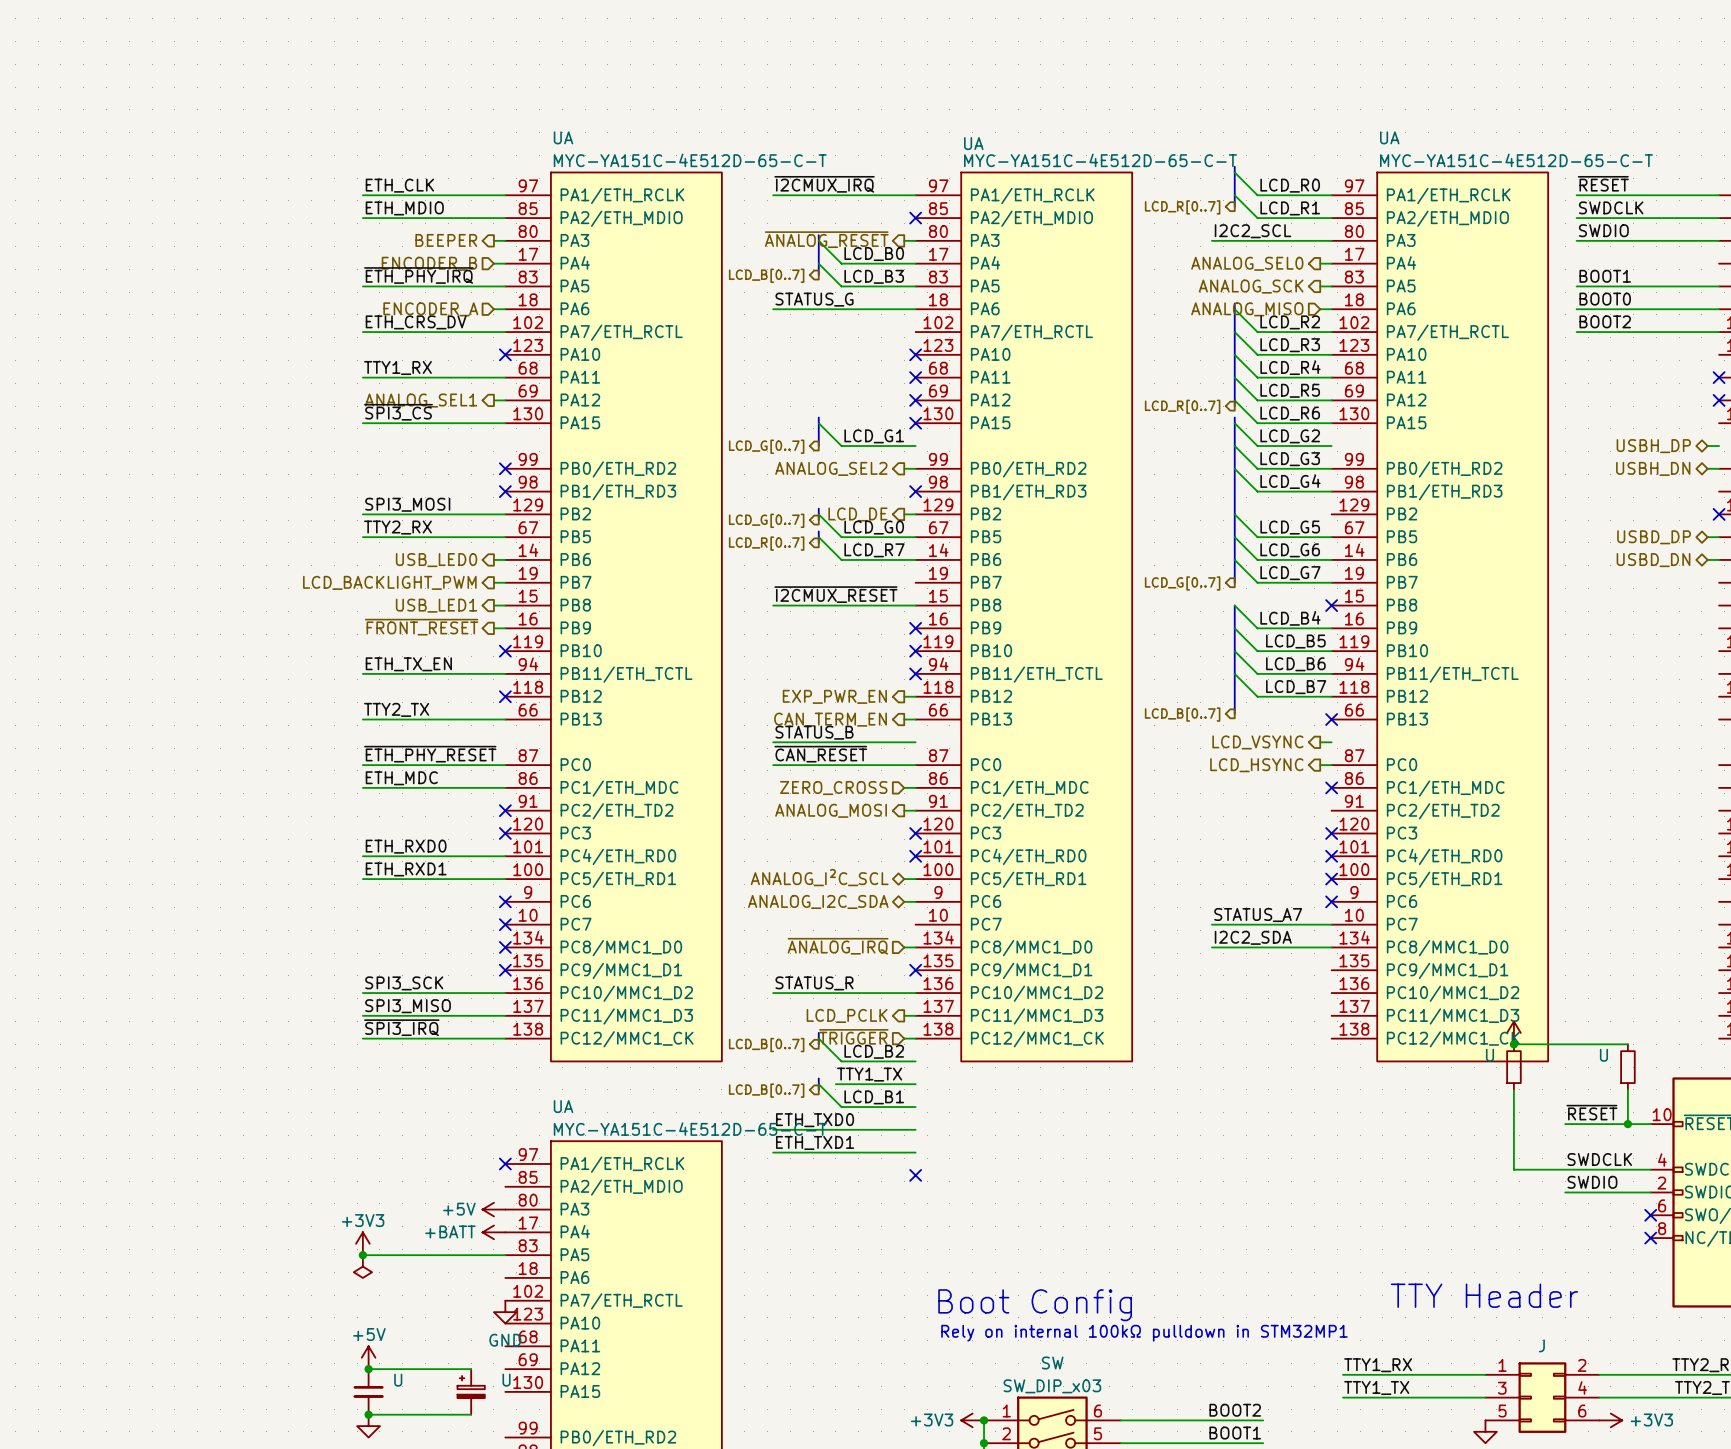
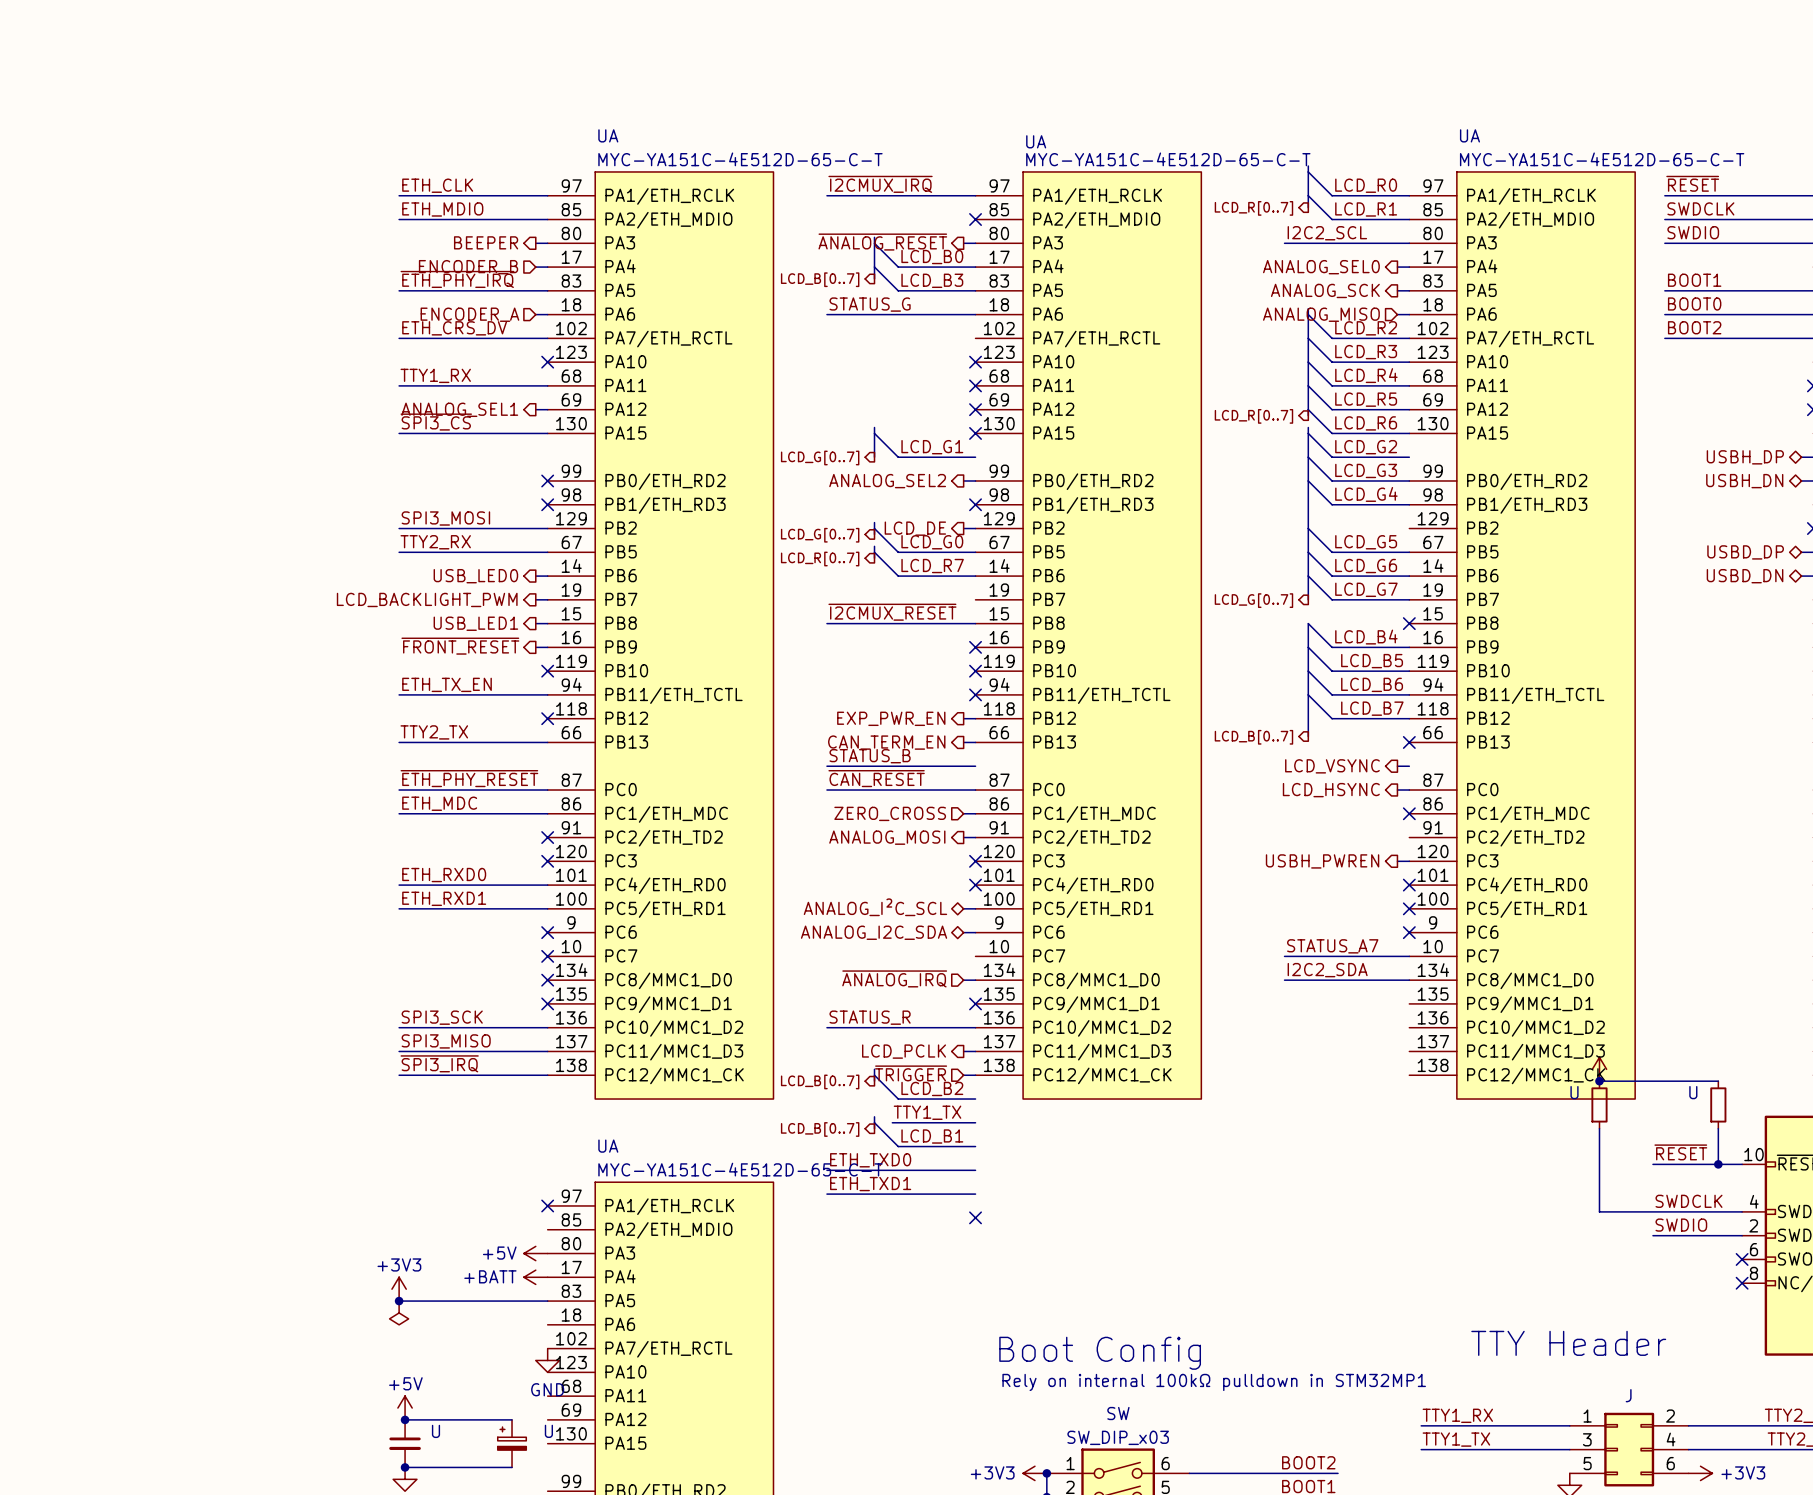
hierarchical label: none -> USBH_PWREN (1322, 861)
wire: none -> (1397, 861) (1409, 861)
no-connect mark: (1331, 833) -> none

